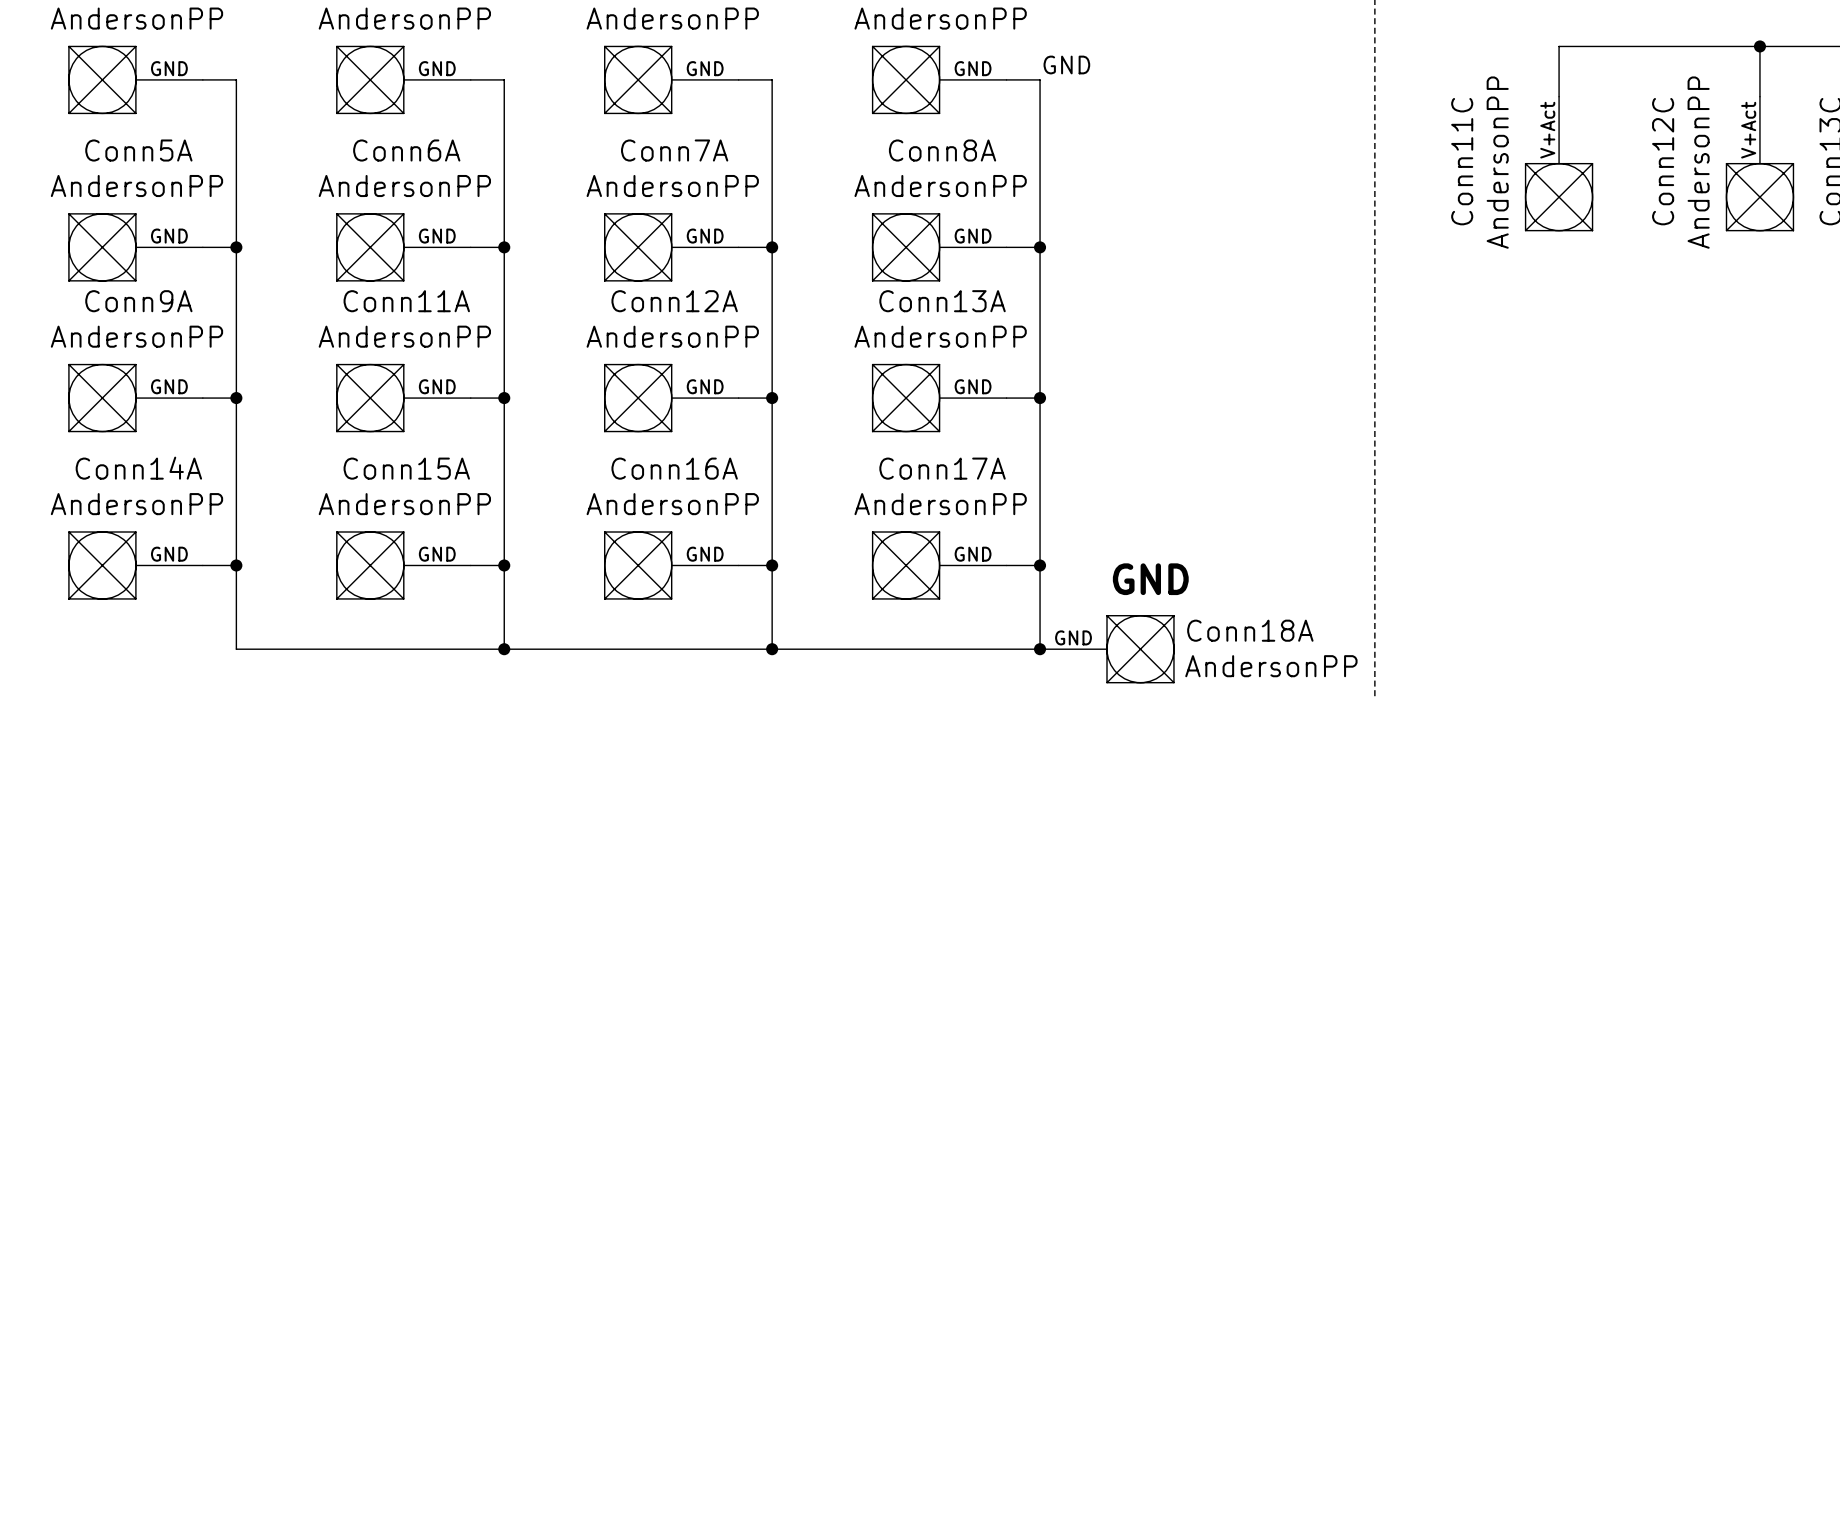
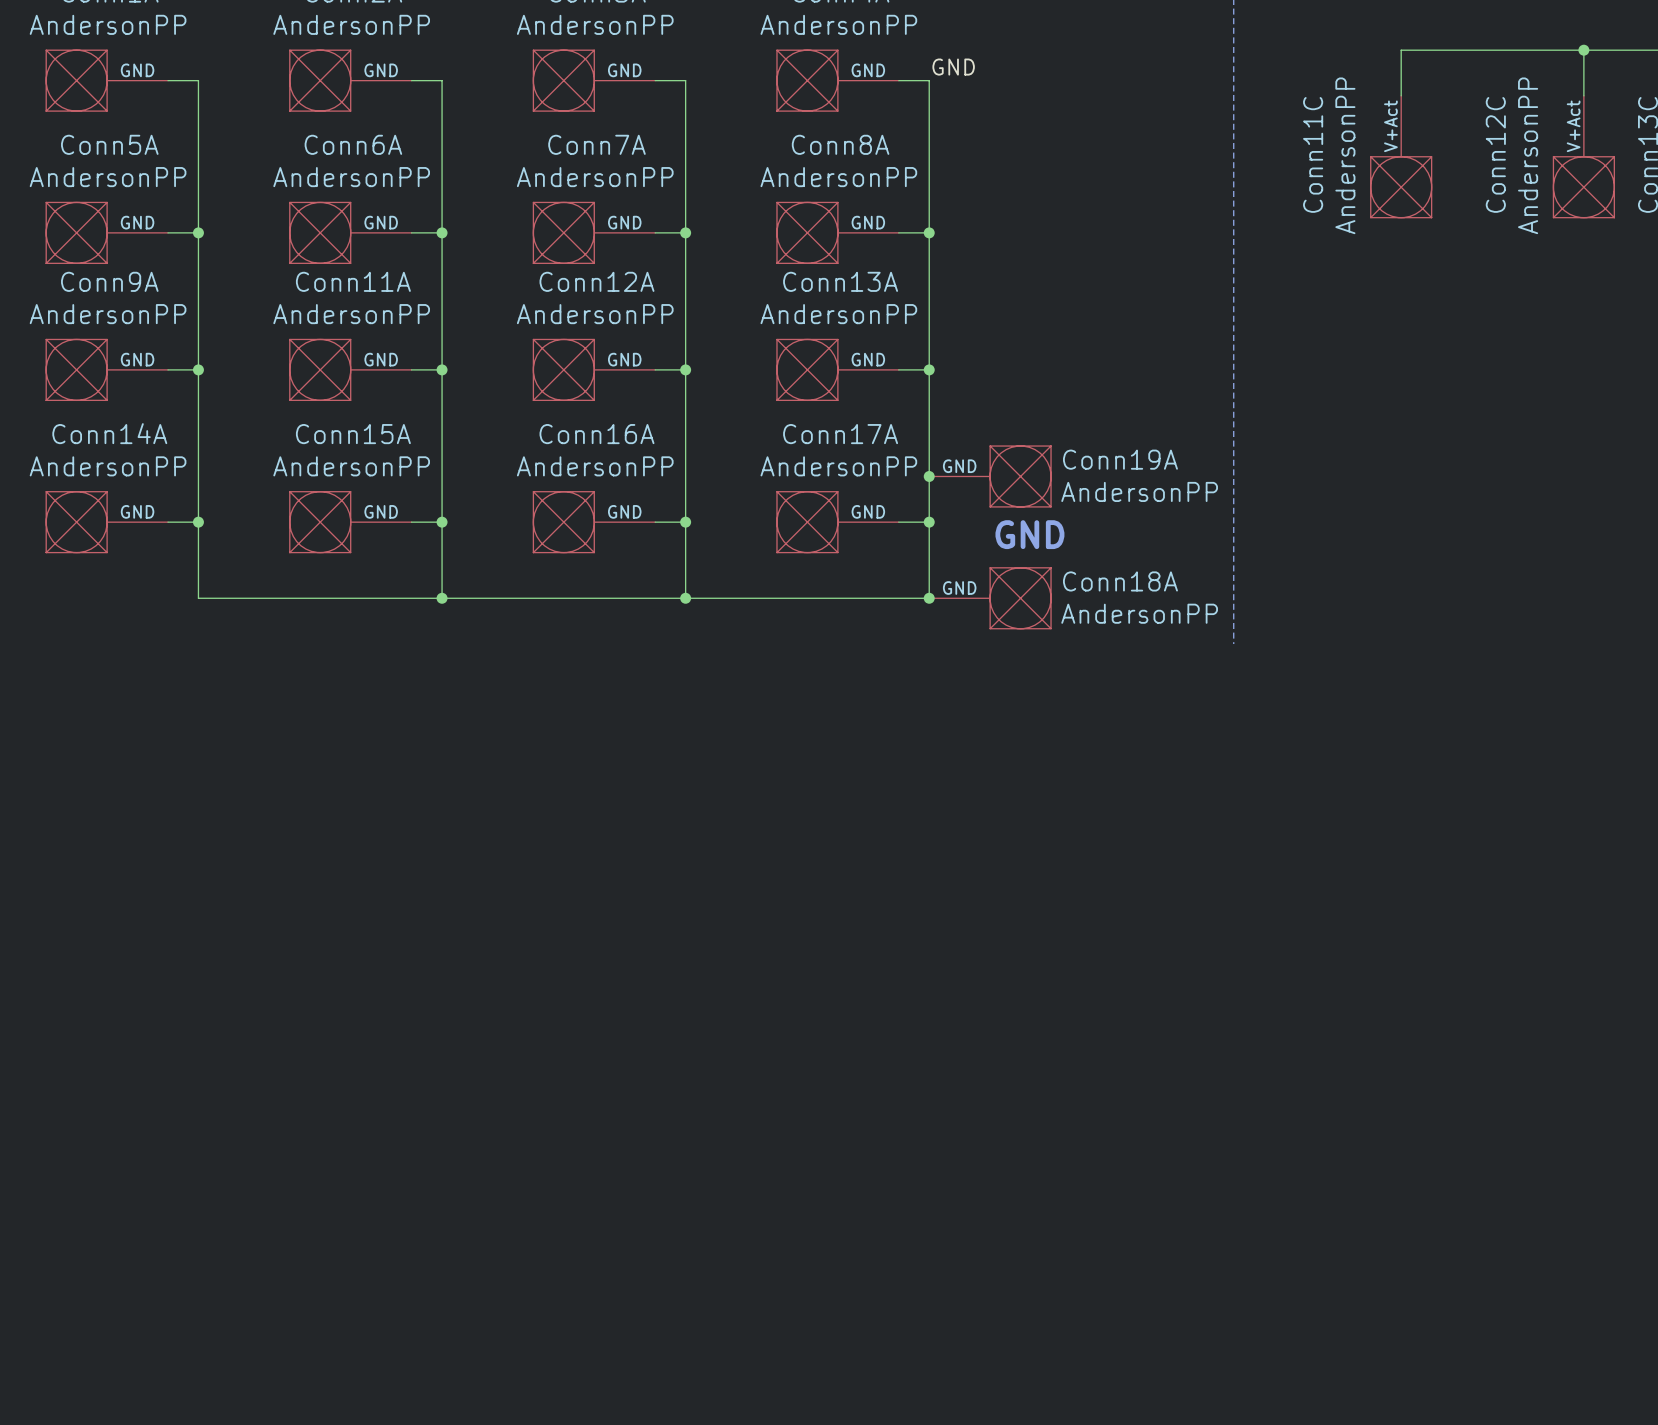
junction: none -> (929, 476)
Conn19A: none -> AndersonPP (990, 476)

